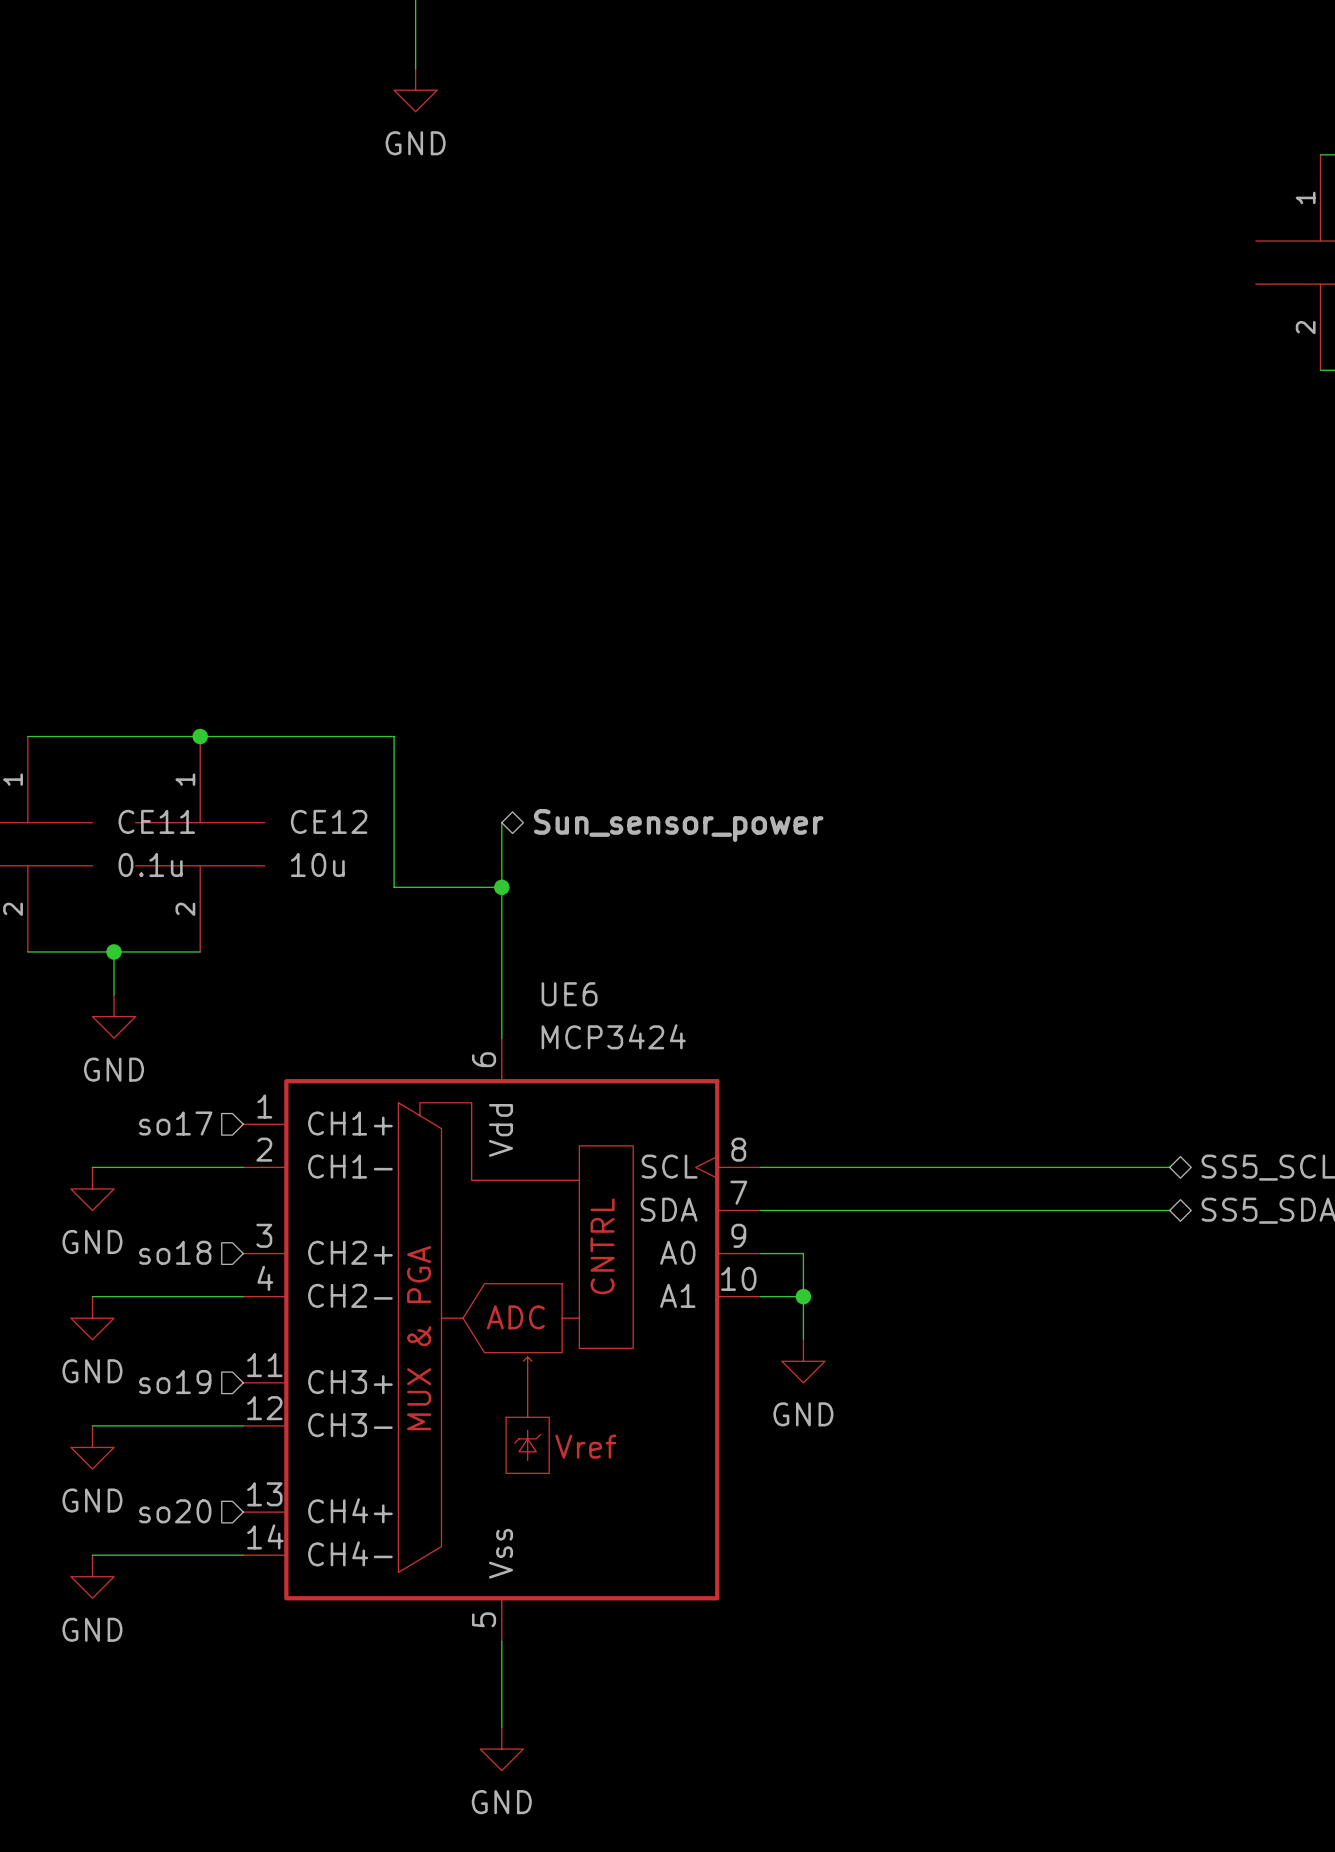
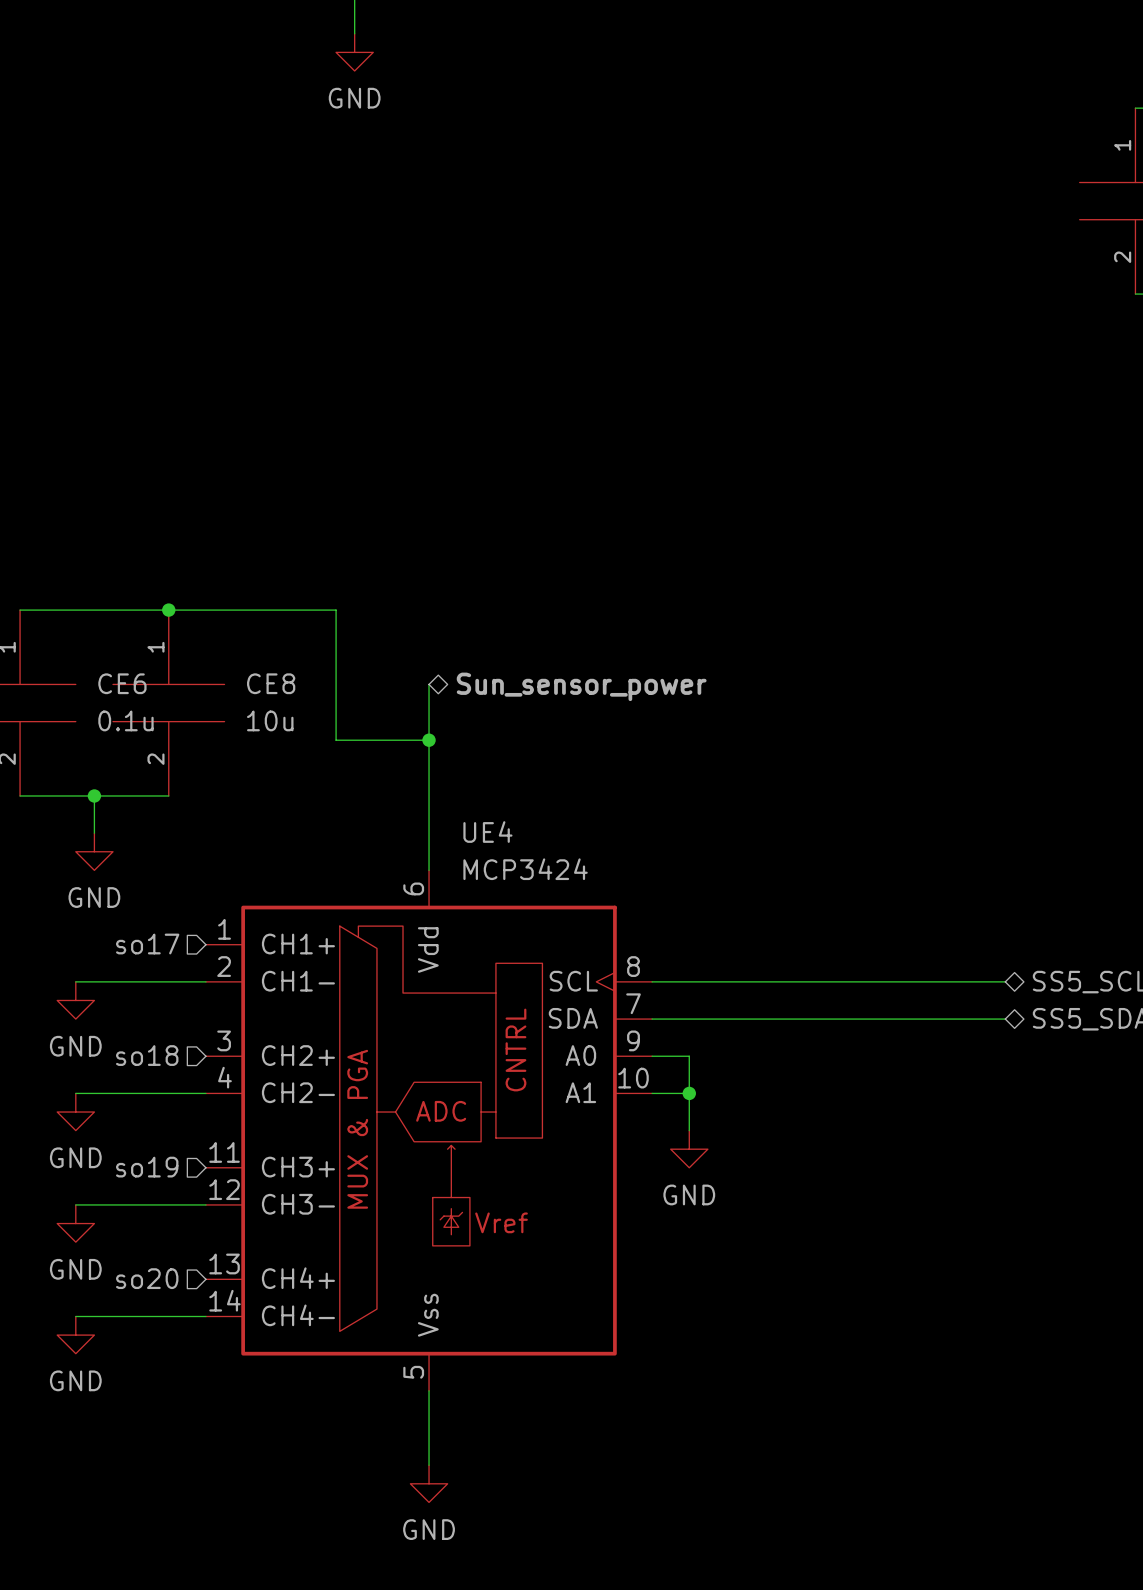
CE11 name: CE11 (156, 821) -> CE6 (122, 683)
CE12 name: CE12 (329, 821) -> CE8 (271, 683)
UE6 name: UE6 (569, 994) -> UE4 (487, 832)

